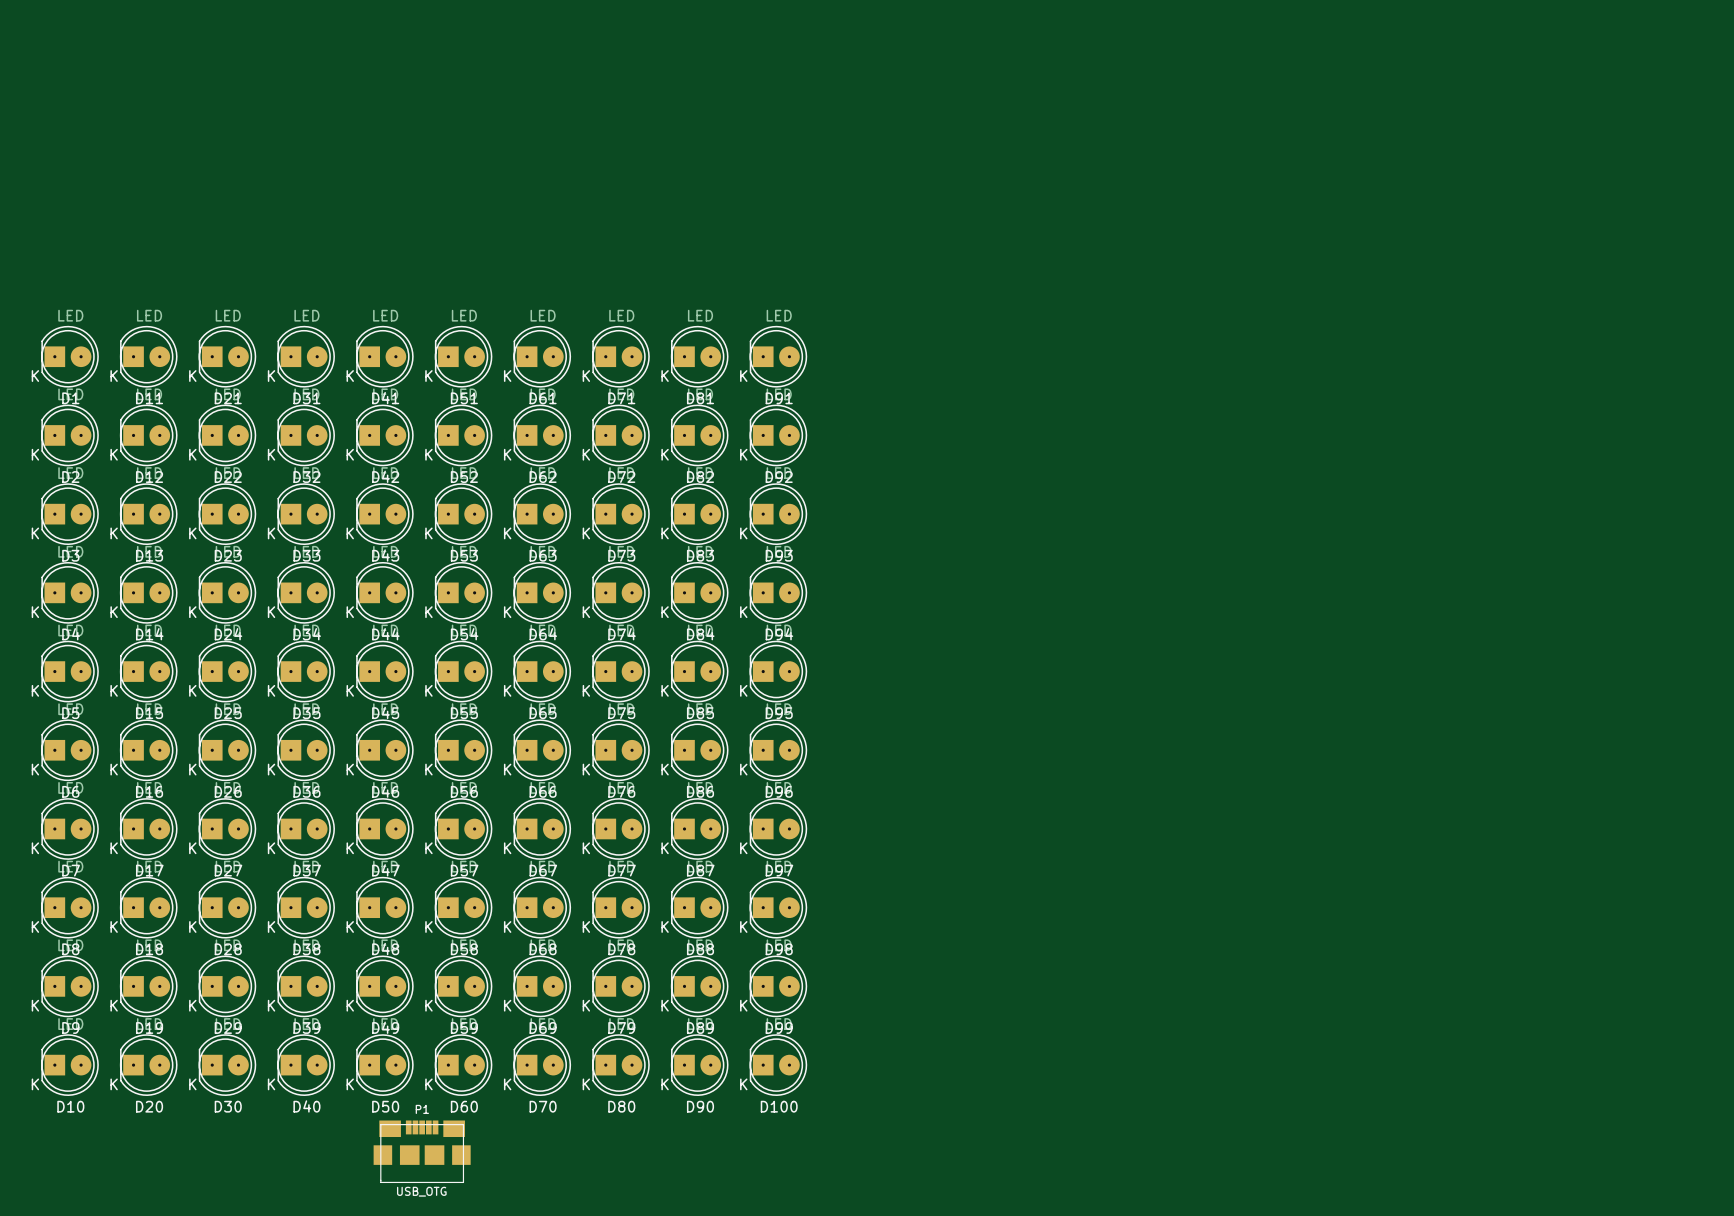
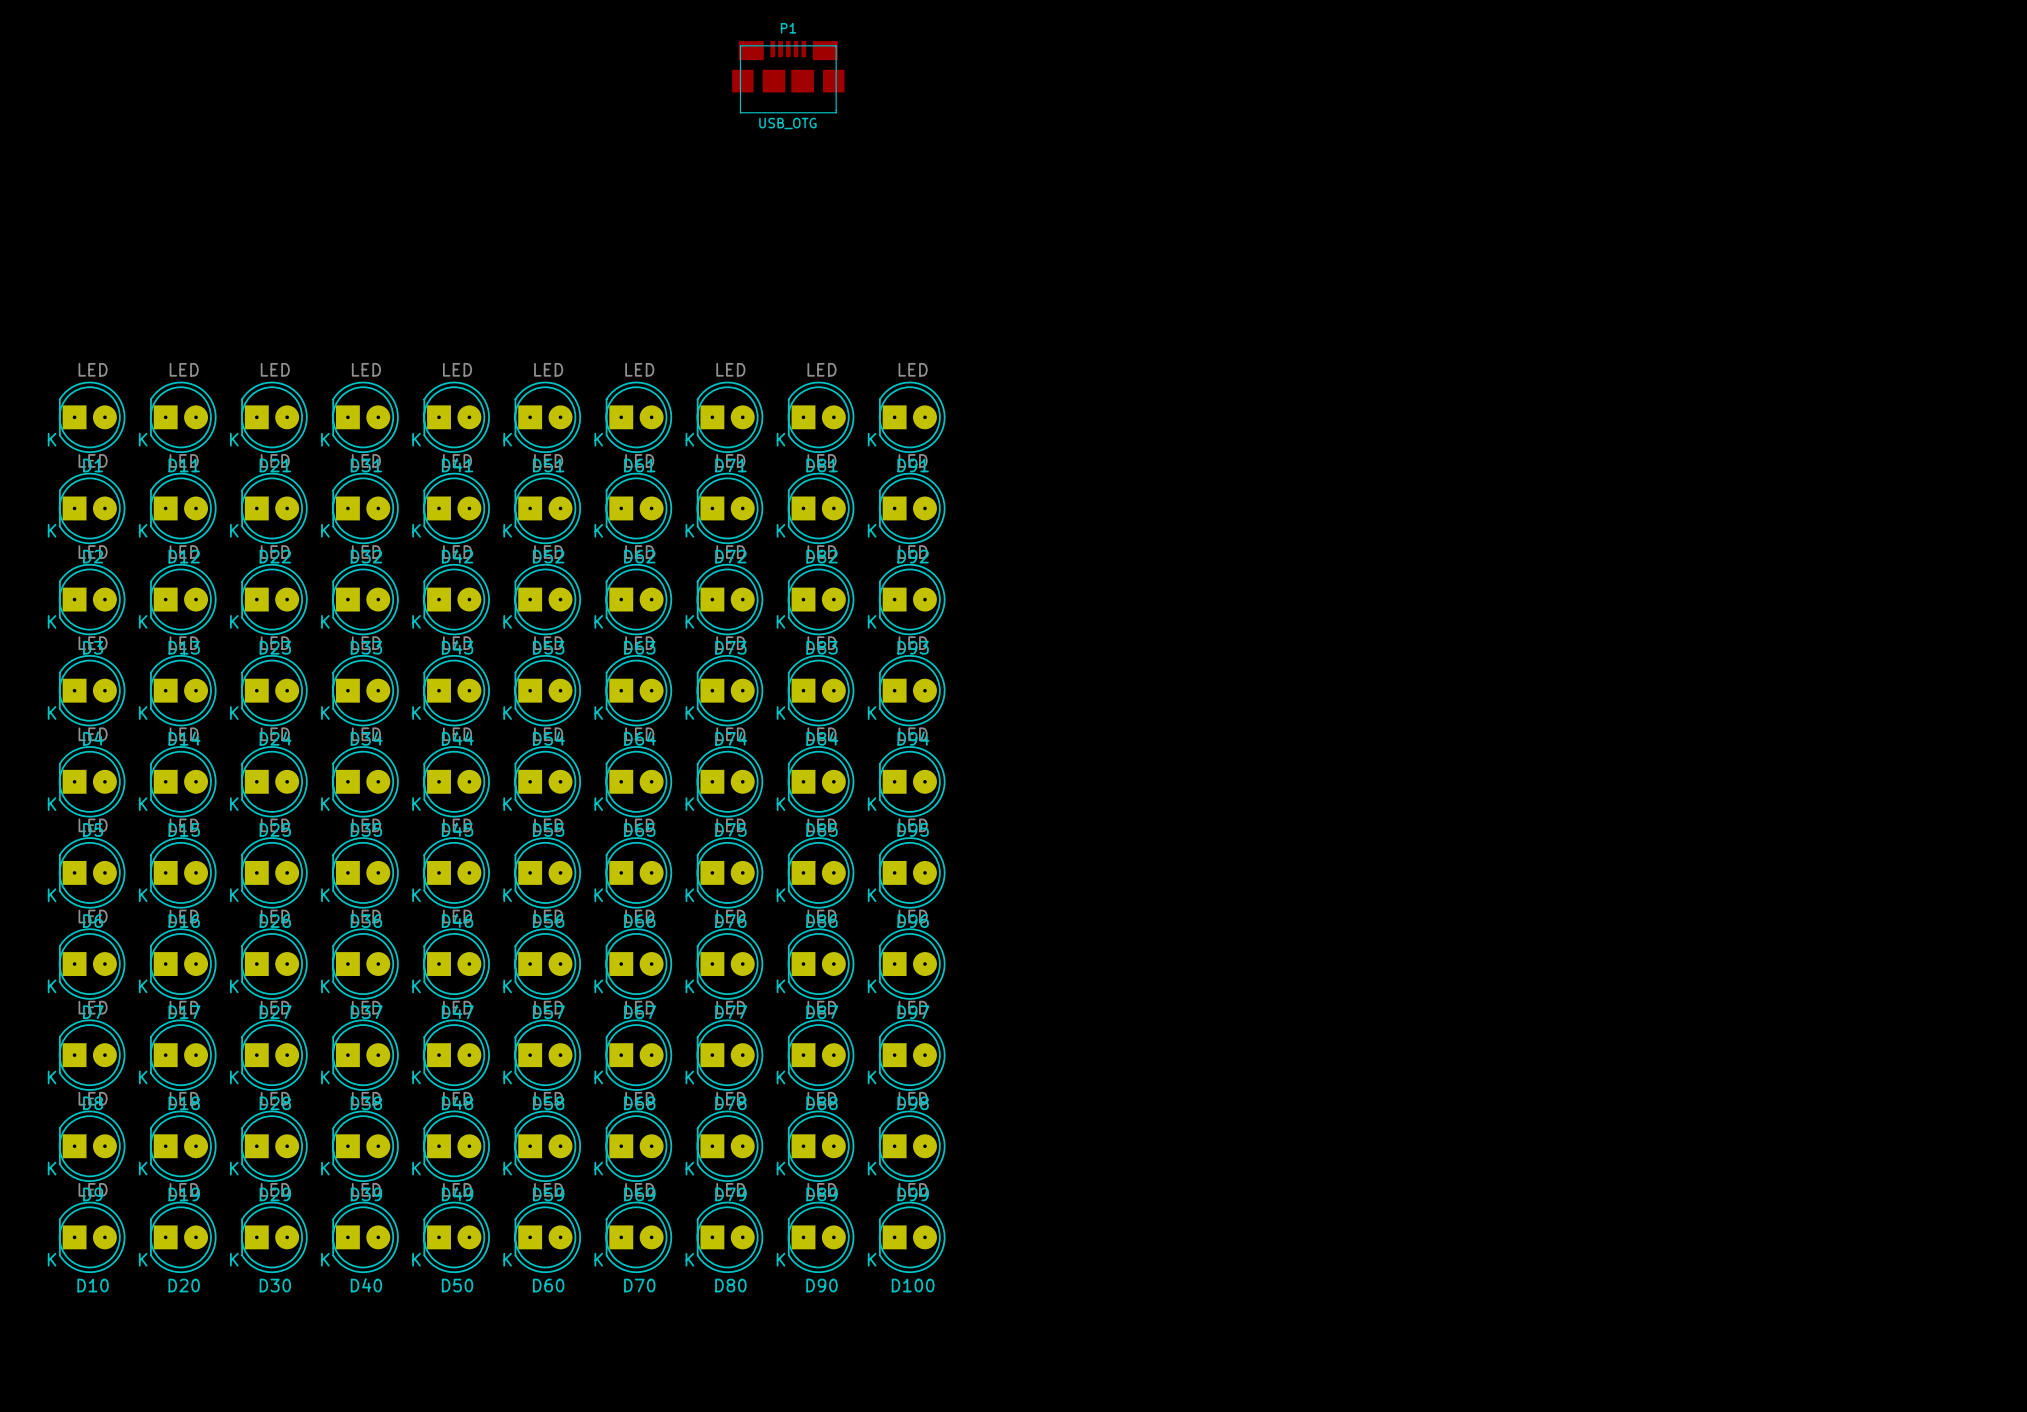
P1 footprint: [373, 1120, 471, 1183] -> [732, 41, 845, 114]

